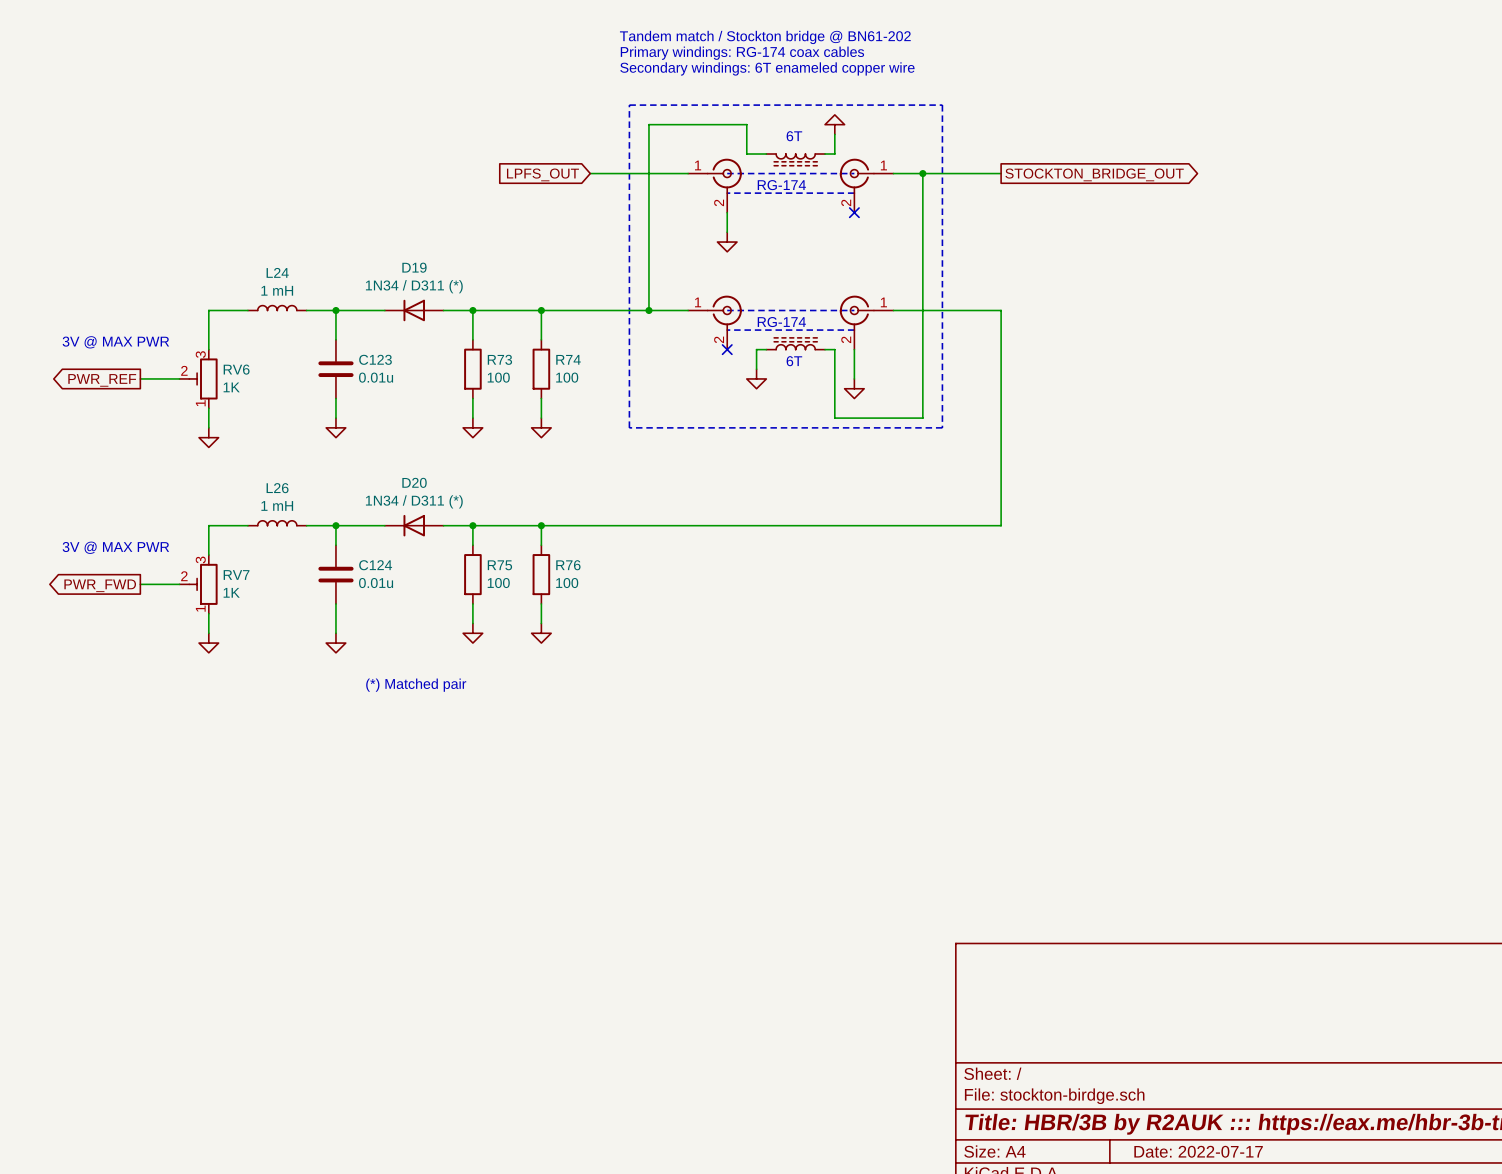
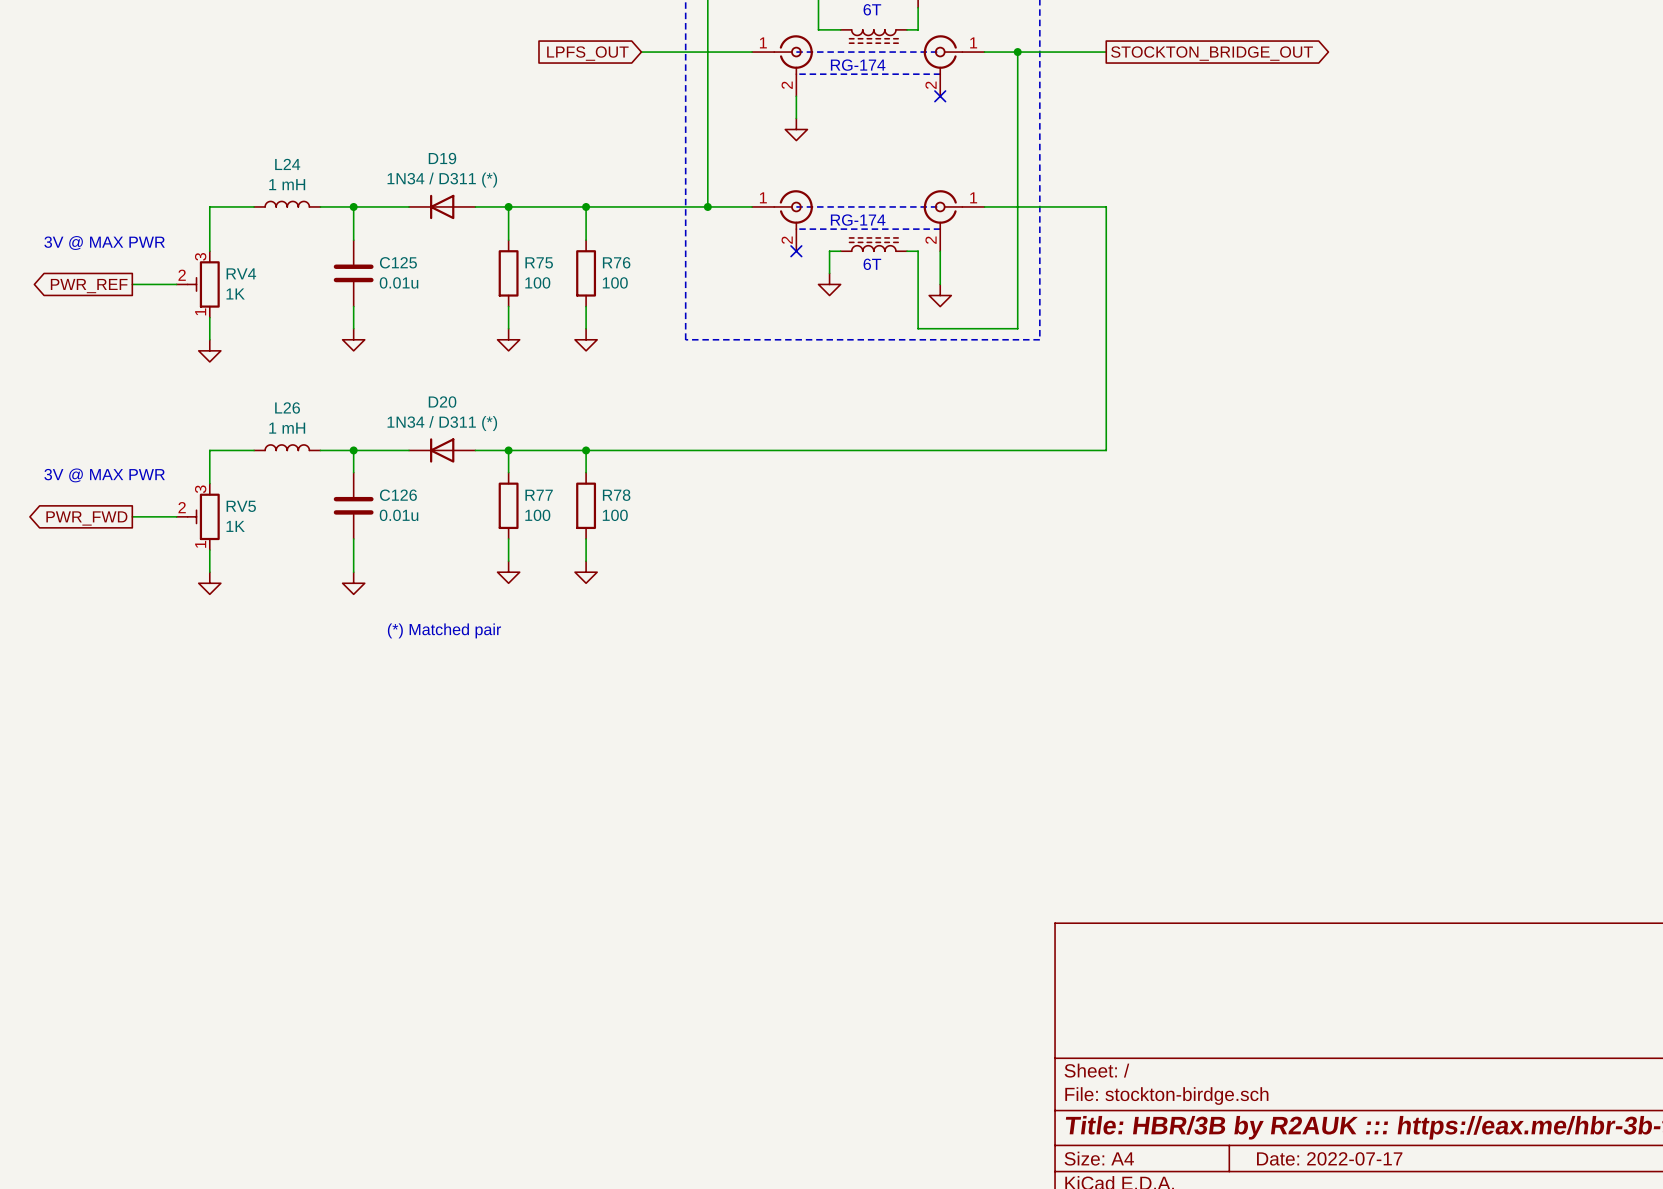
C123 name: C123 (375, 359) -> C125 (398, 262)
R73 name: R73 (499, 359) -> R75 (539, 262)
R74 name: R74 (568, 359) -> R76 (616, 262)
RV6 name: RV6 (236, 369) -> RV4 (241, 273)
C124 name: C124 (375, 565) -> C126 (398, 495)
R75 name: R75 (499, 565) -> R77 (539, 495)
R76 name: R76 (568, 565) -> R78 (616, 495)
RV7 name: RV7 (236, 575) -> RV5 (241, 506)

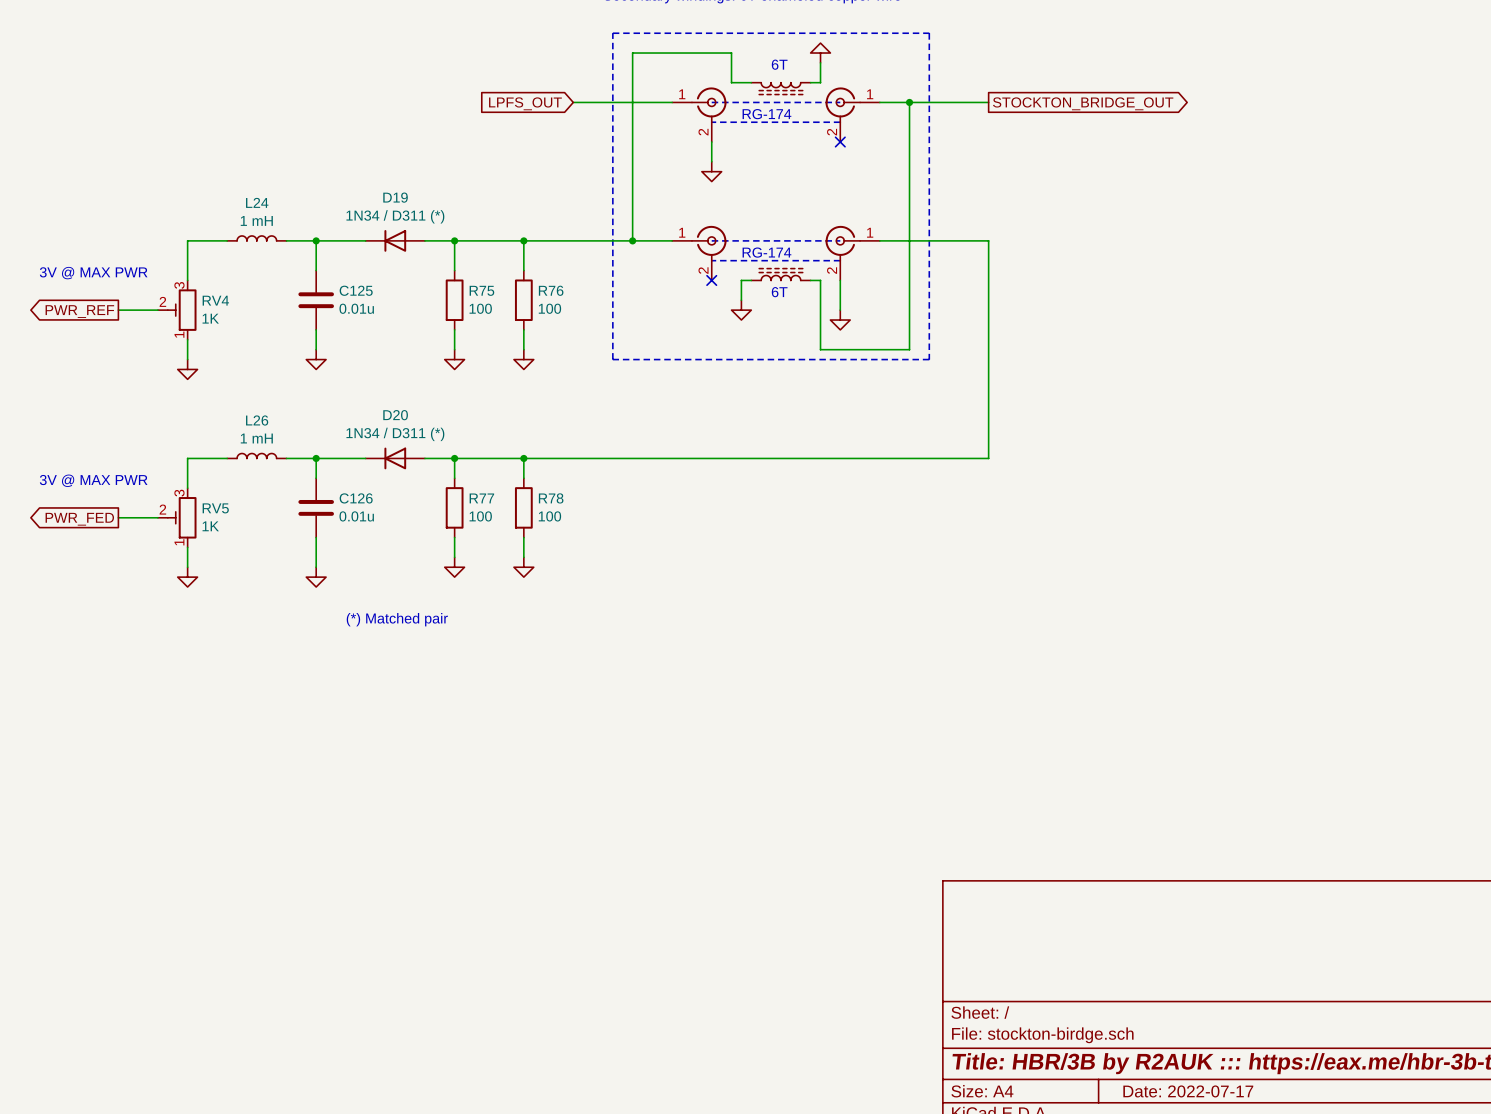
global label: PWR_FWD (86, 518) -> PWR_FED (79, 519)

